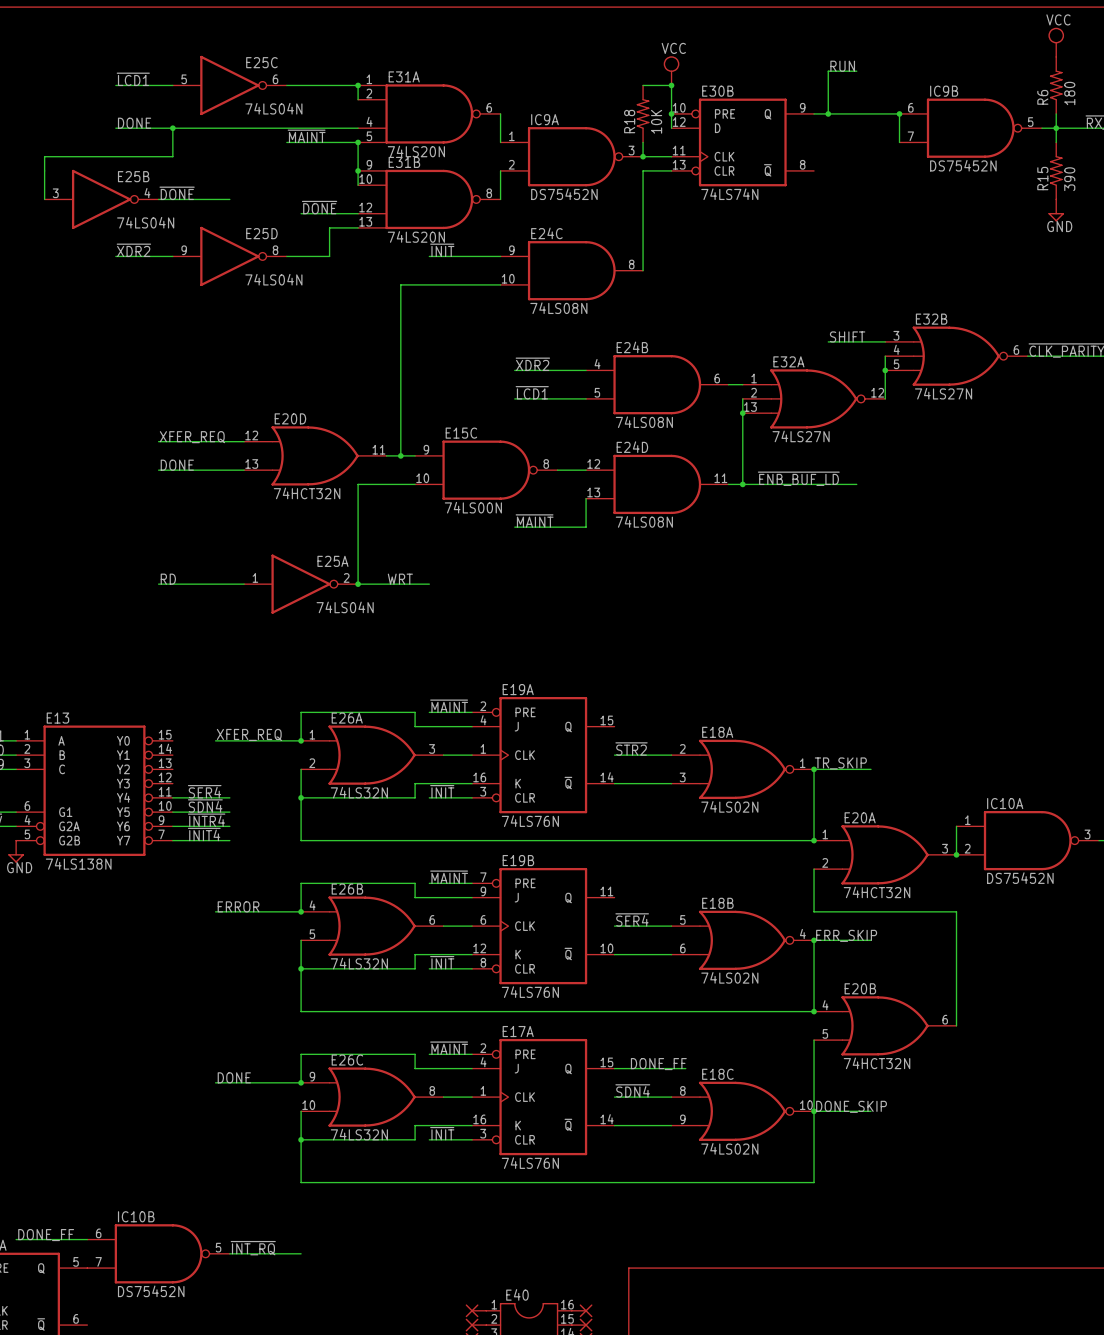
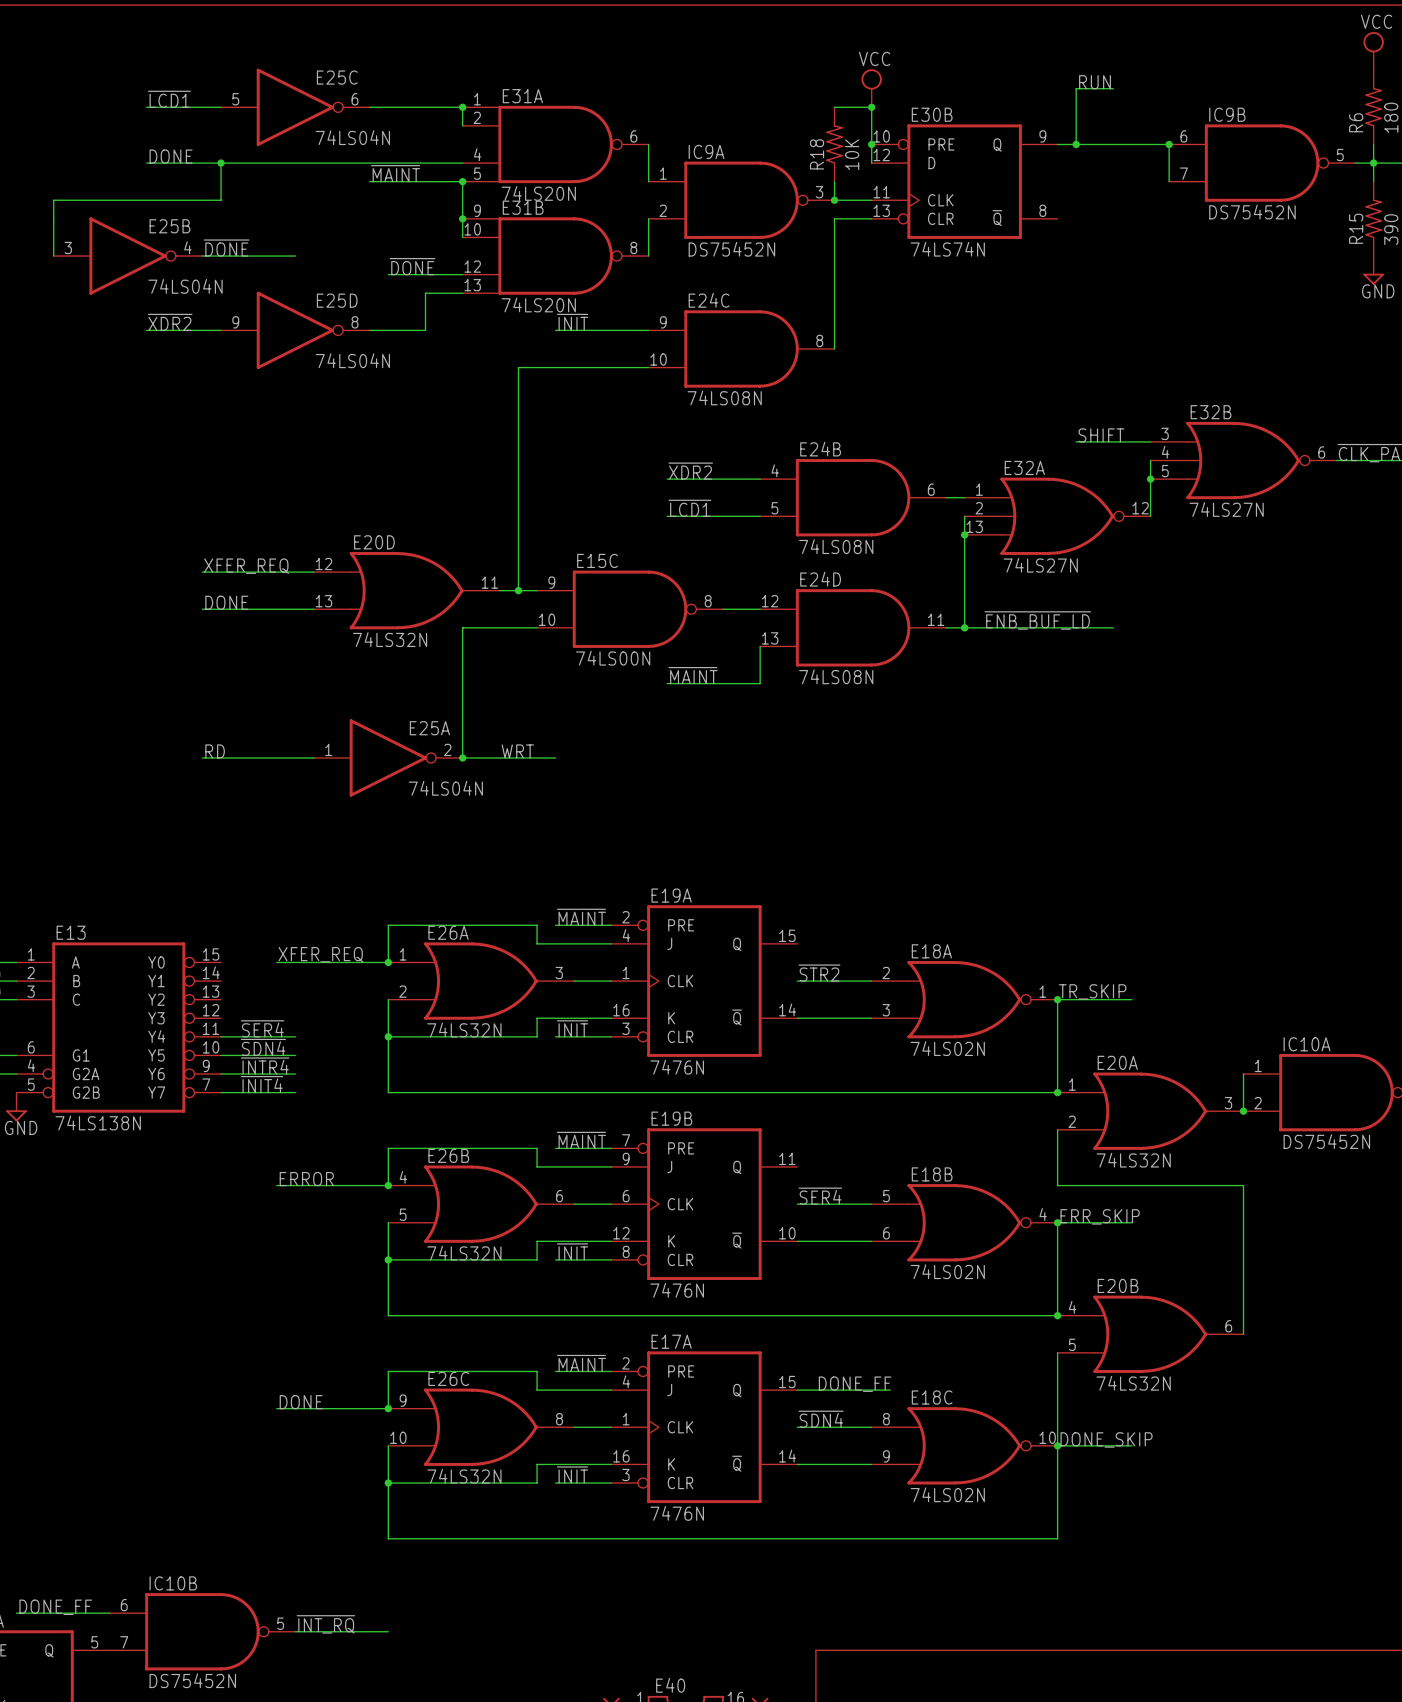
E20D value: 74HCT32N (307, 493) -> 74LS32N (390, 639)
E19A value: 74LS76N (530, 821) -> 7476N (677, 1067)
E20A value: 74HCT32N (877, 892) -> 74LS32N (1133, 1160)
E19B value: 74LS76N (530, 992) -> 7476N (677, 1290)
E20B value: 74HCT32N (877, 1063) -> 74LS32N (1133, 1383)
E17A value: 74LS76N (530, 1163) -> 7476N (677, 1513)

